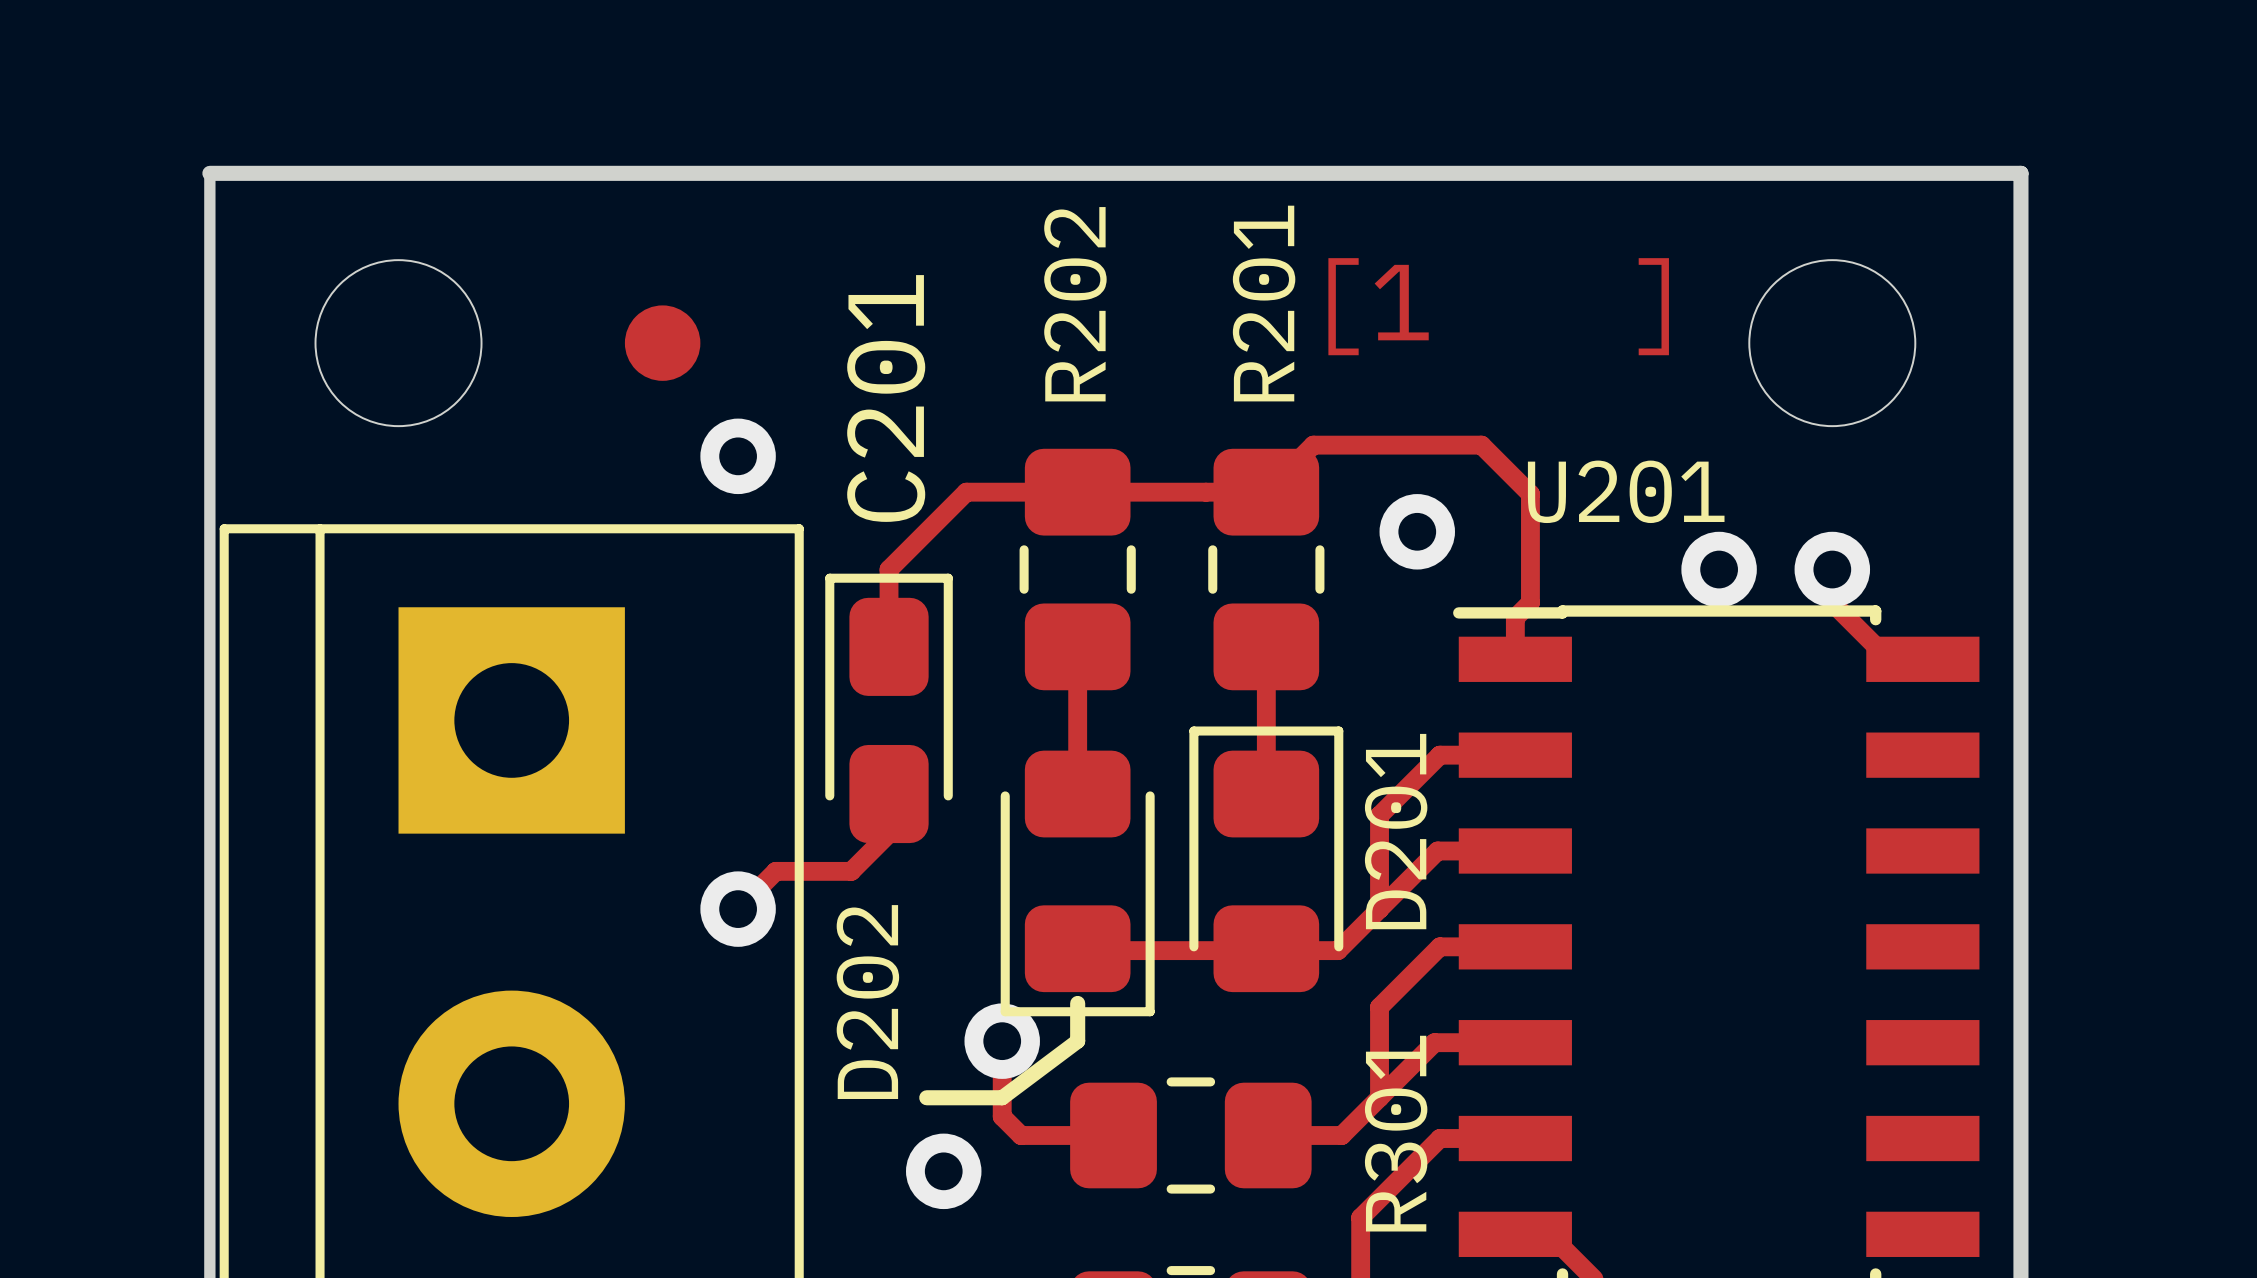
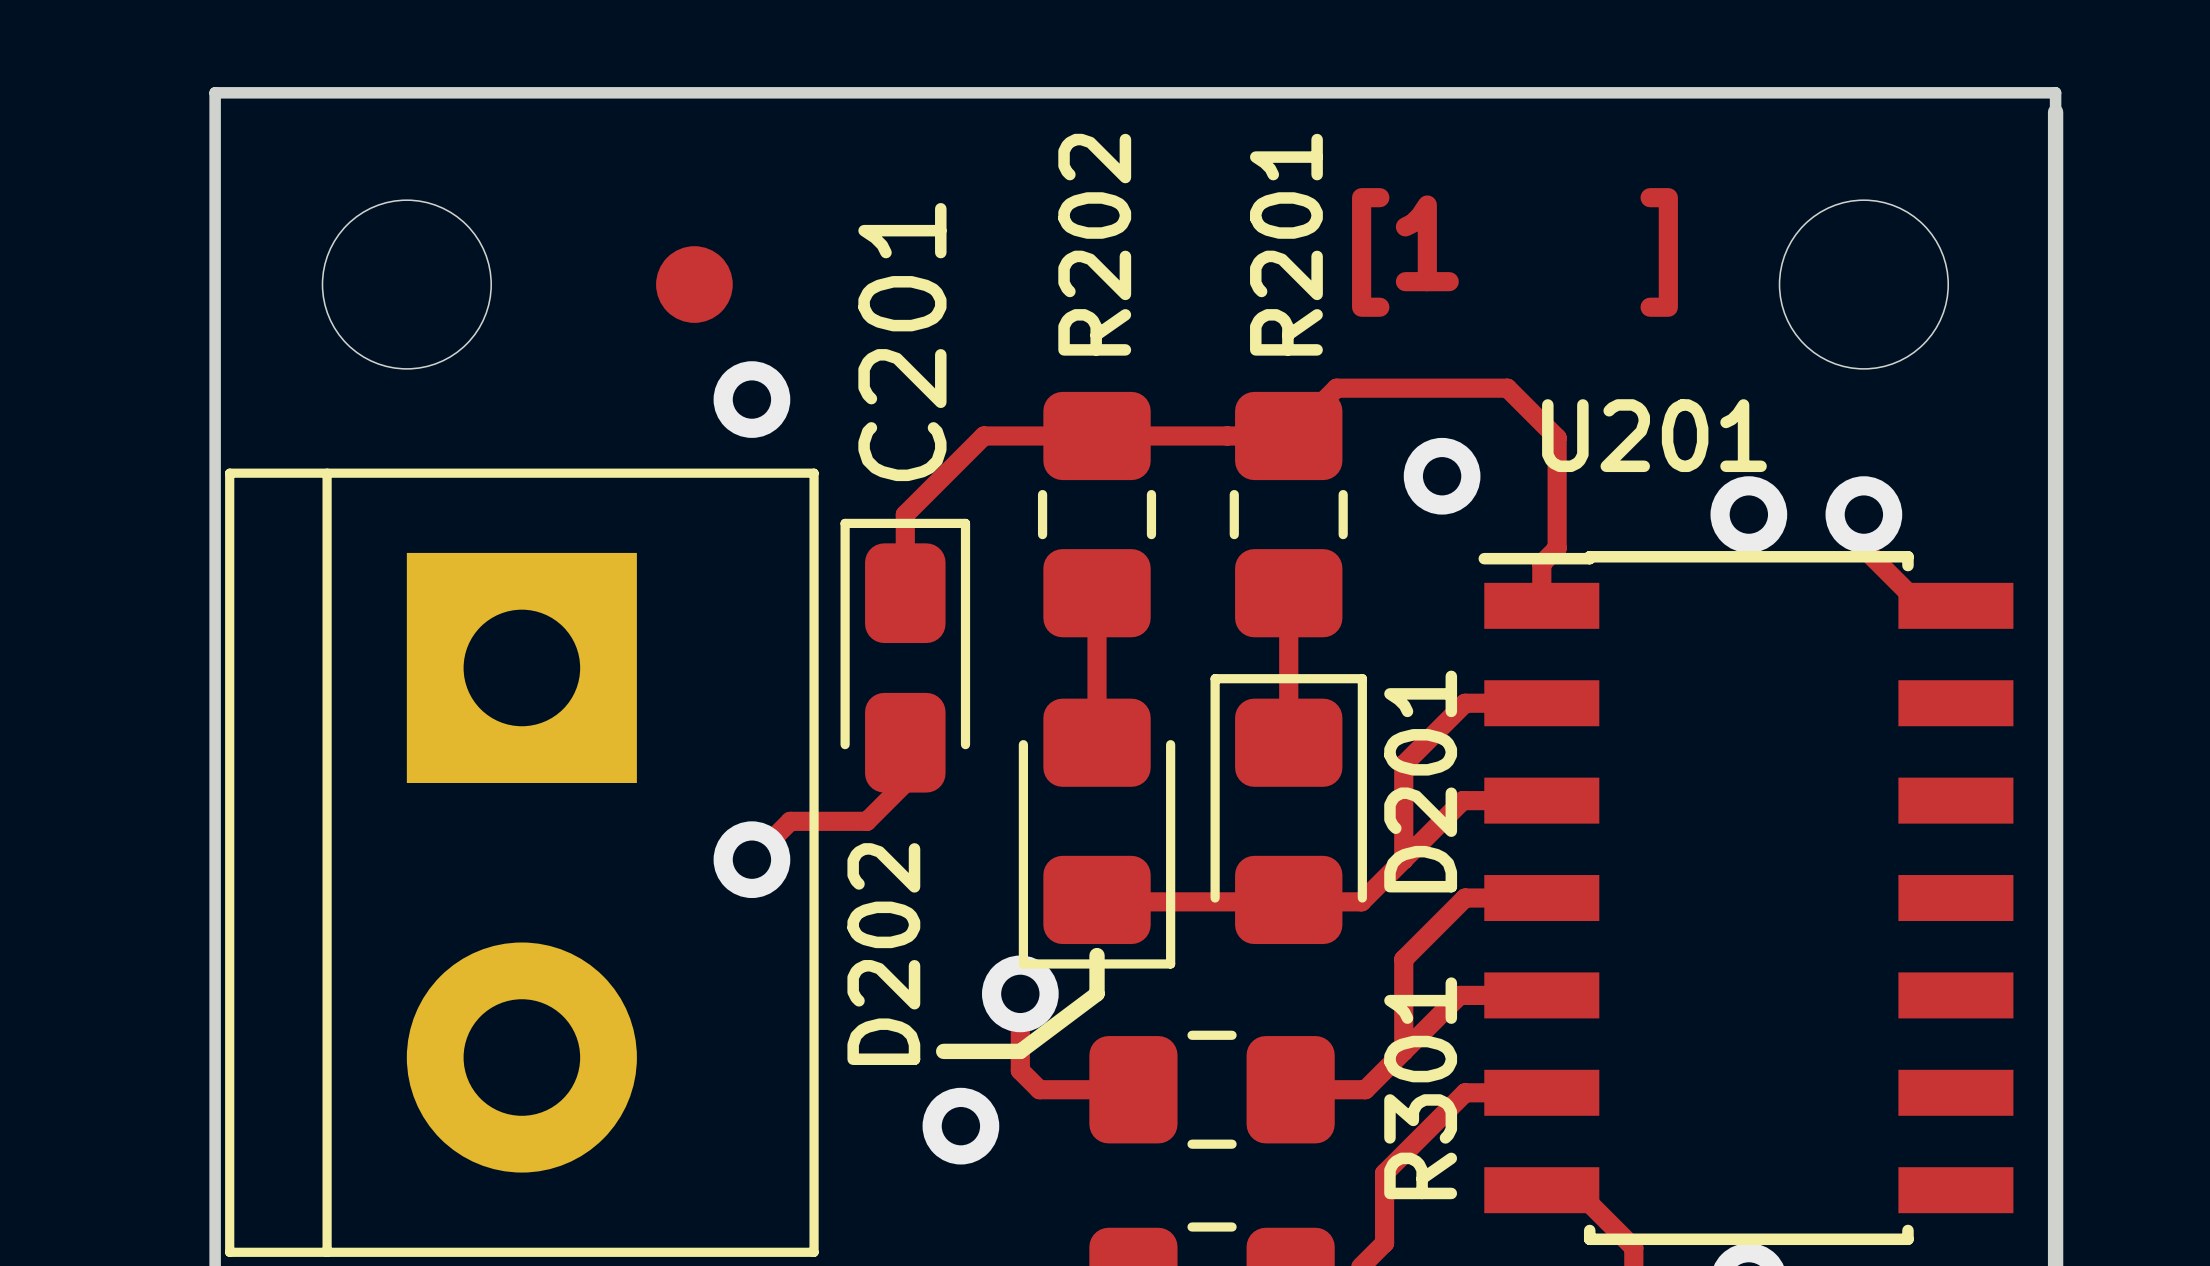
board edge: (209, 173) (2020, 173) -> (215, 111) (215, 92) (2055, 92) (2055, 111)
part position: (662, 343) -> (694, 284)

